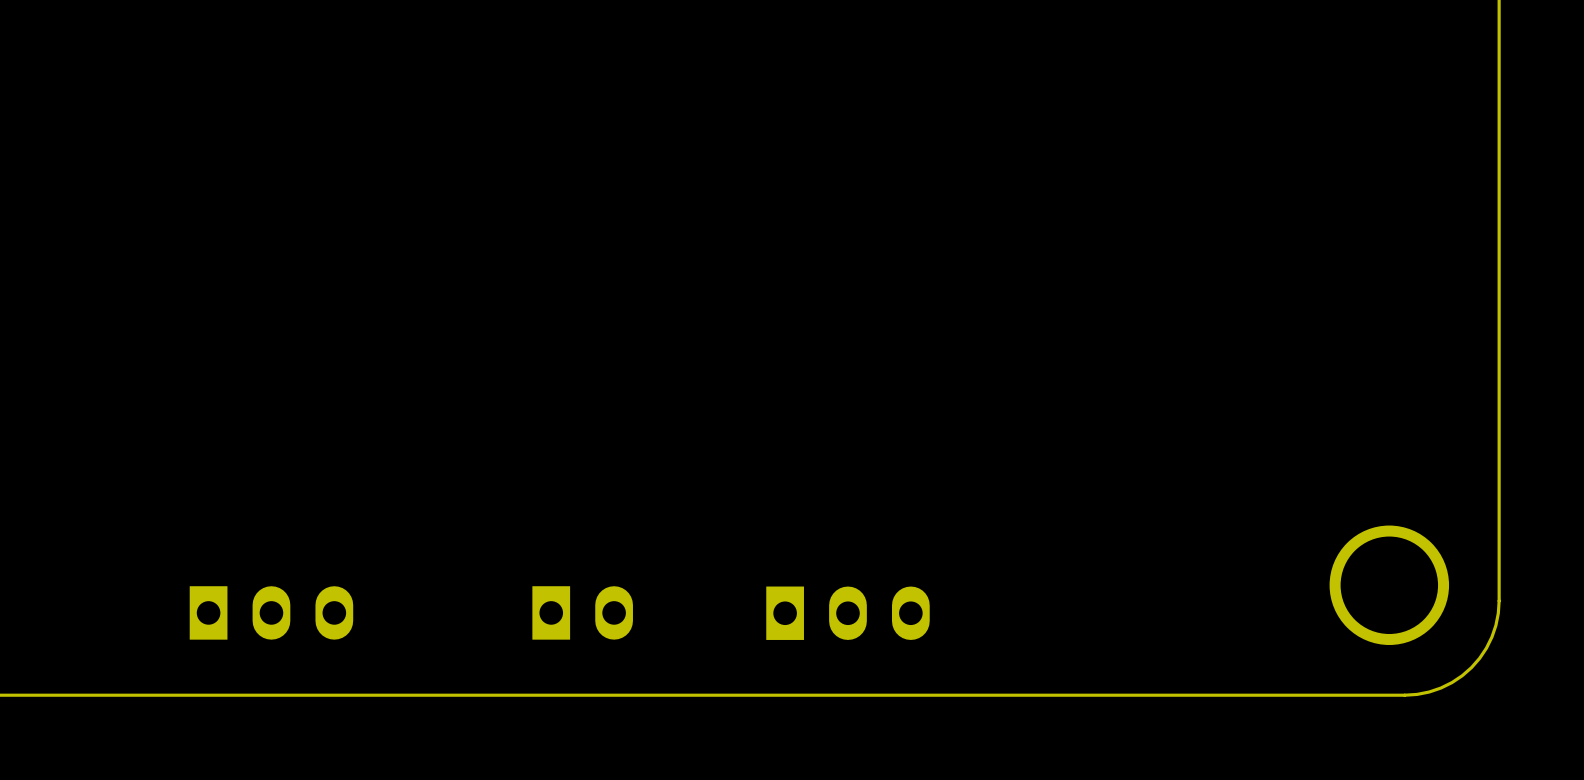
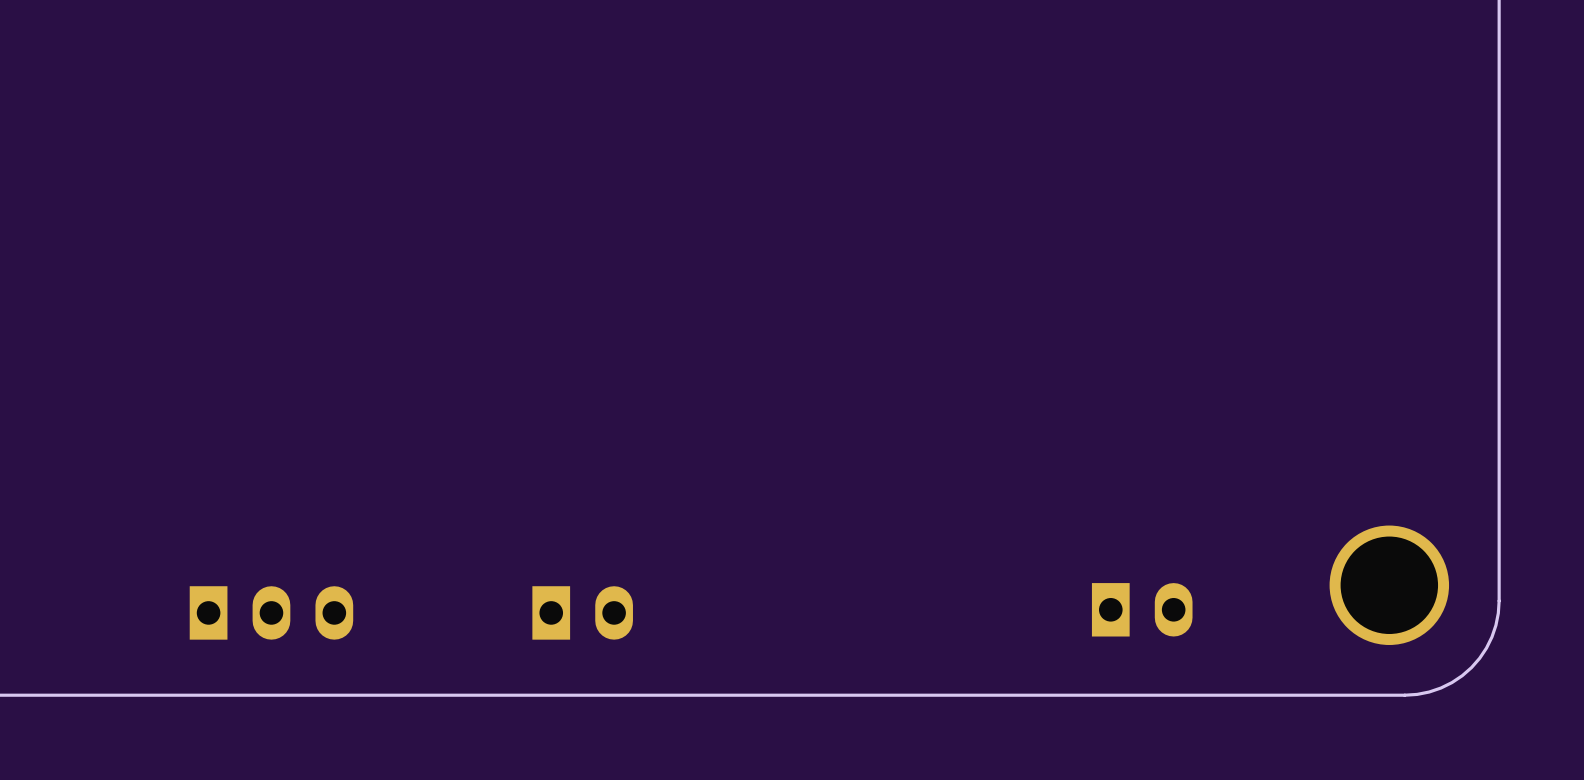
part: none -> (1142, 609)
part: (847, 613) -> none

